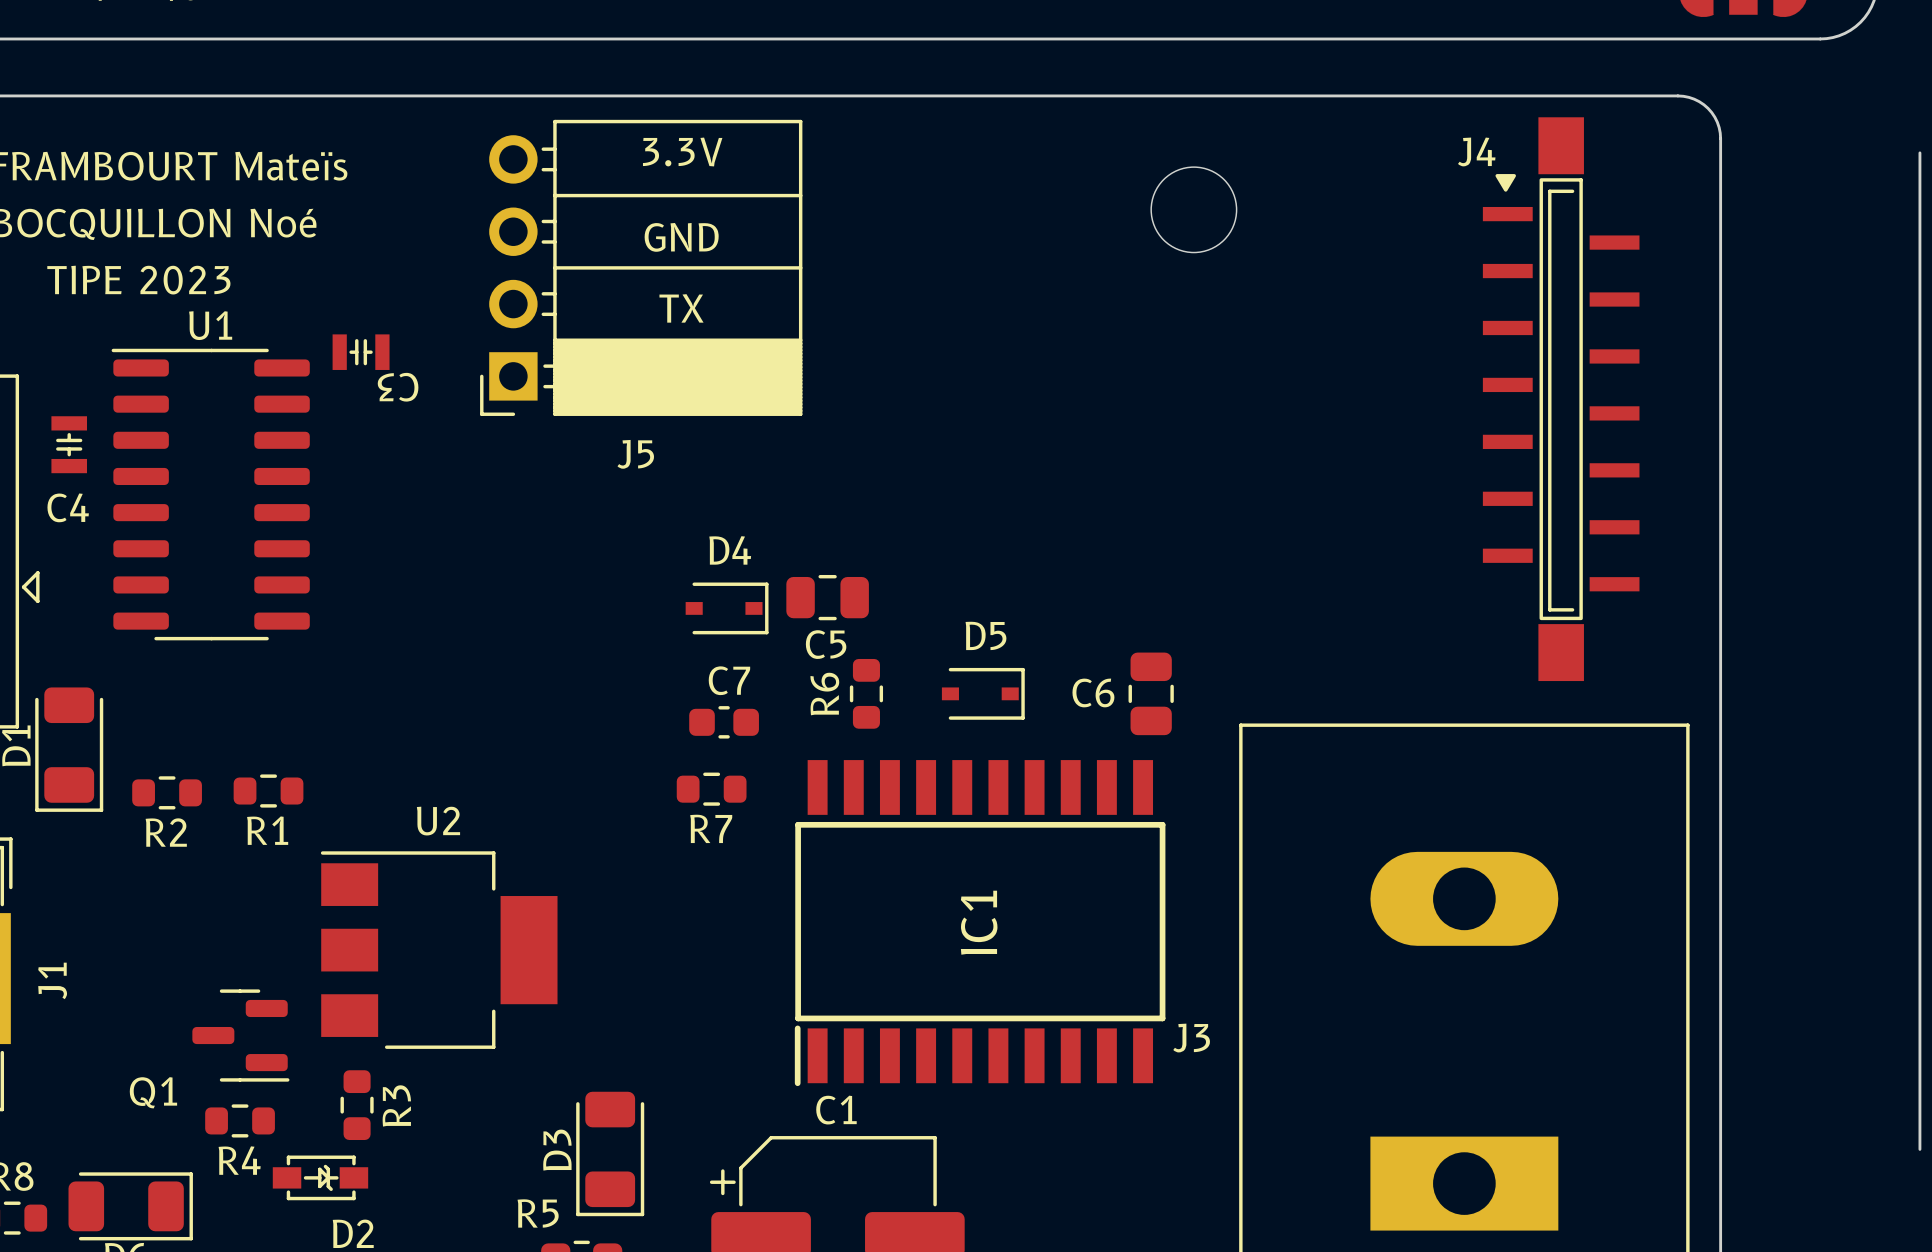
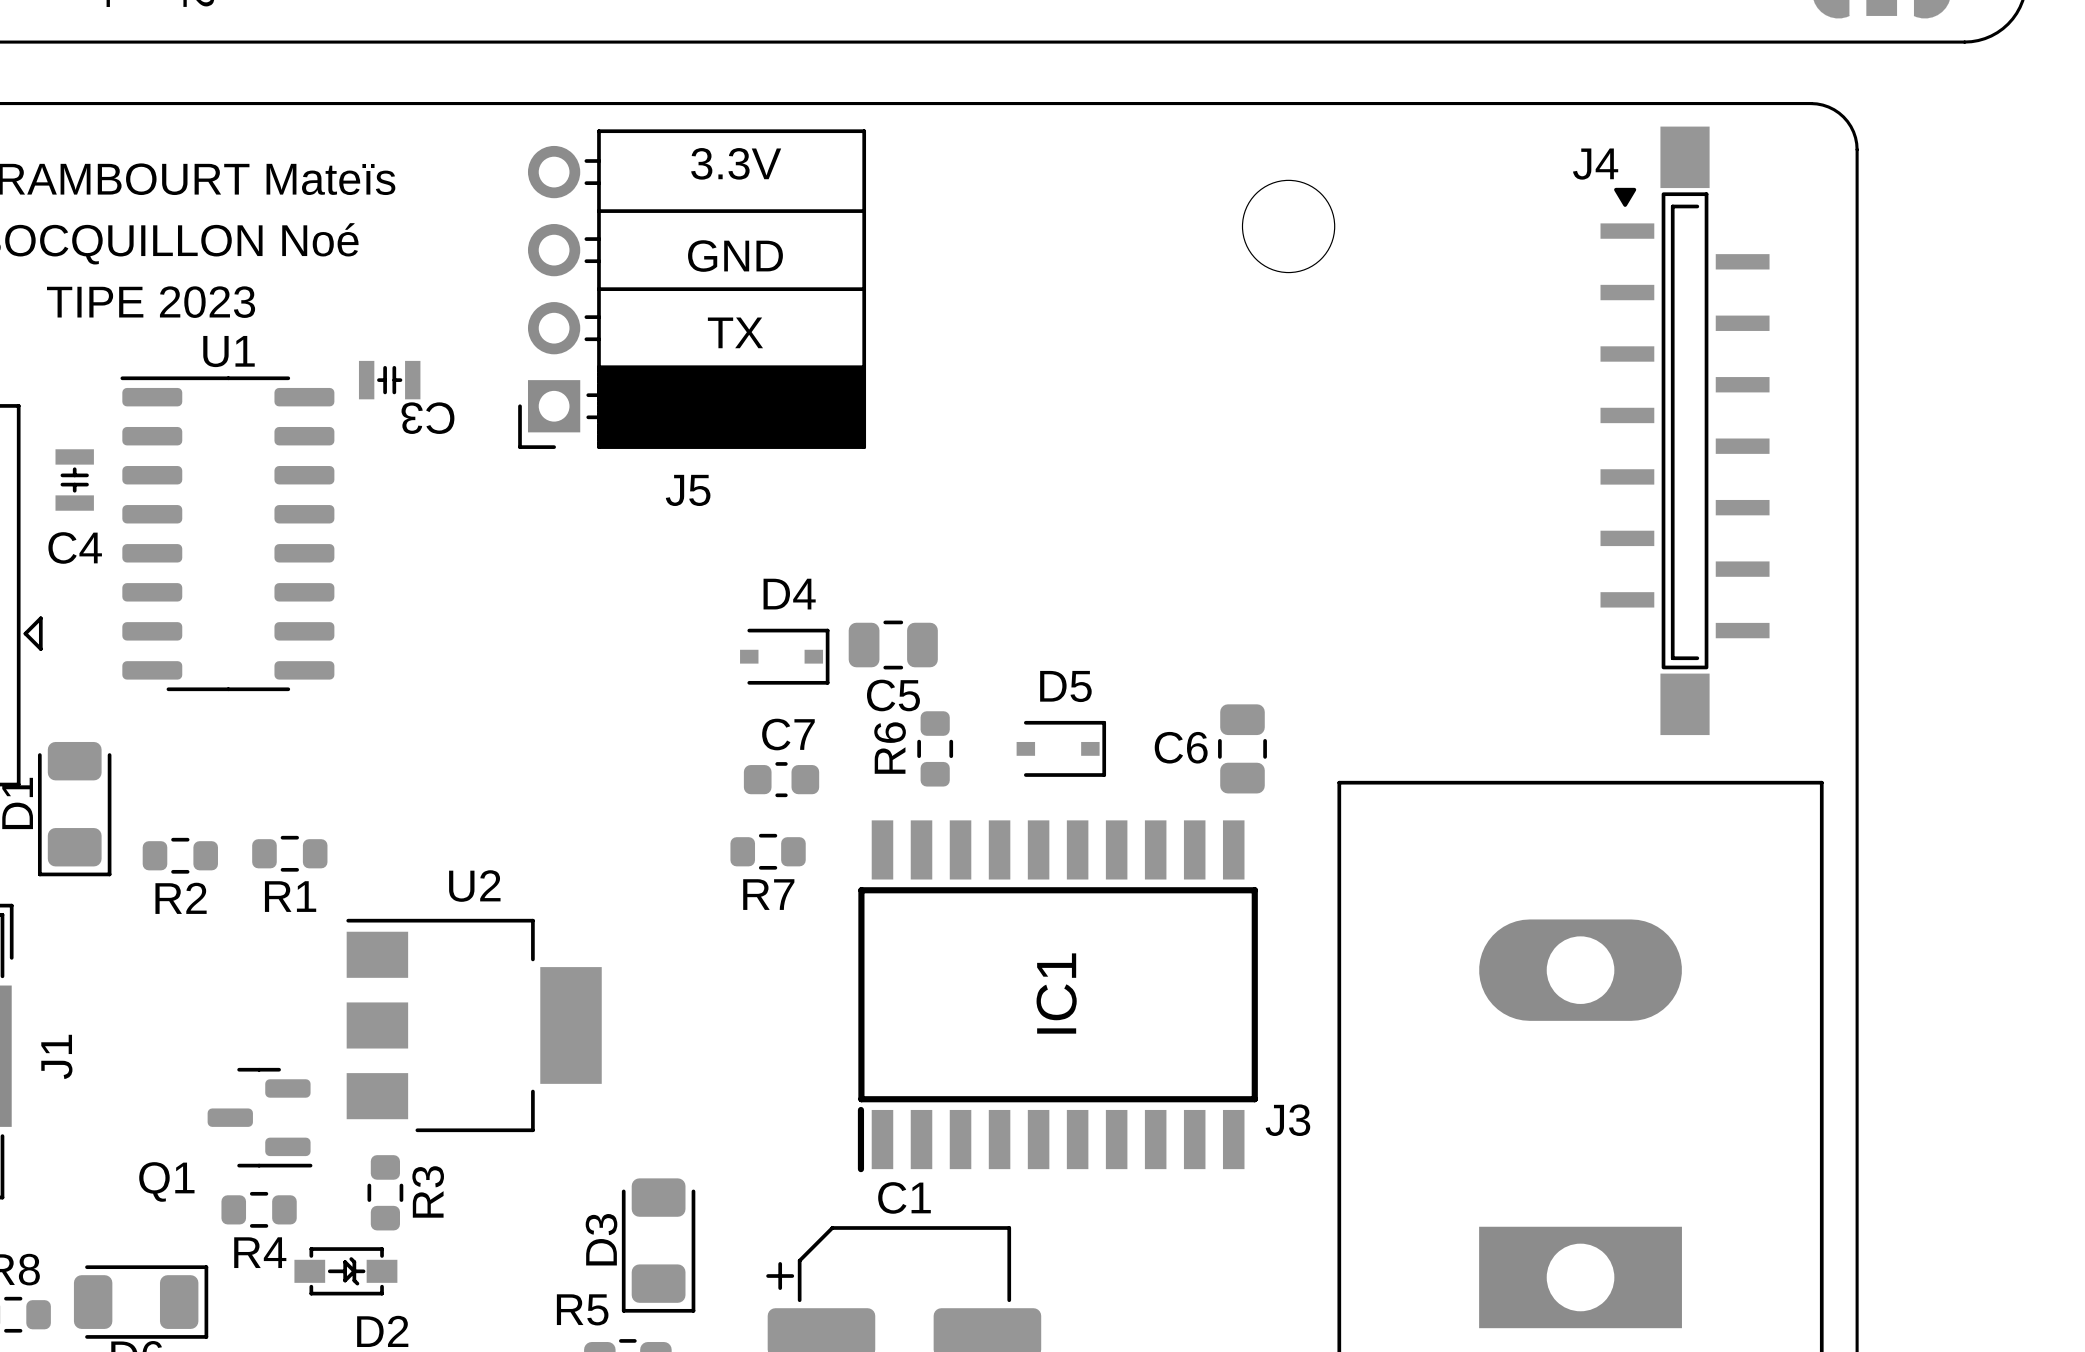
board edge: (1919, 152) (1919, 1149) -> none

